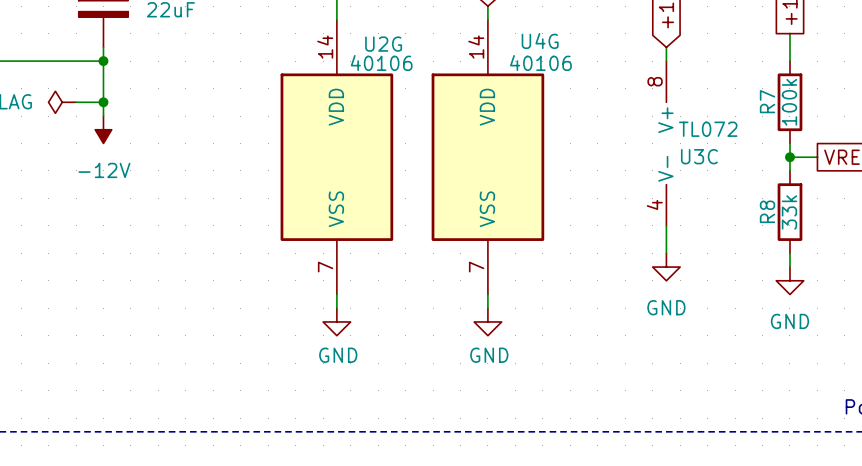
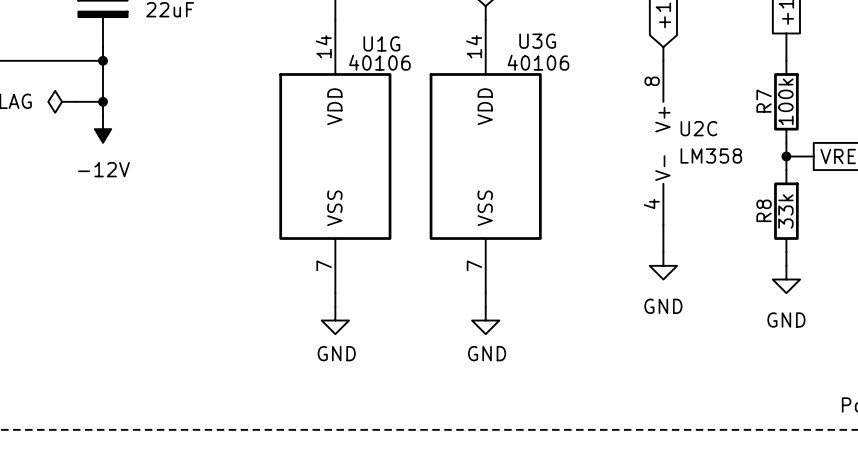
U4G name: U4G (540, 41) -> U3G (537, 41)
U2G name: U2G (383, 44) -> U1G (381, 43)
U3C value: TL072 (708, 129) -> LM358 (711, 155)
U3C name: U3C (699, 156) -> U2C (698, 128)

